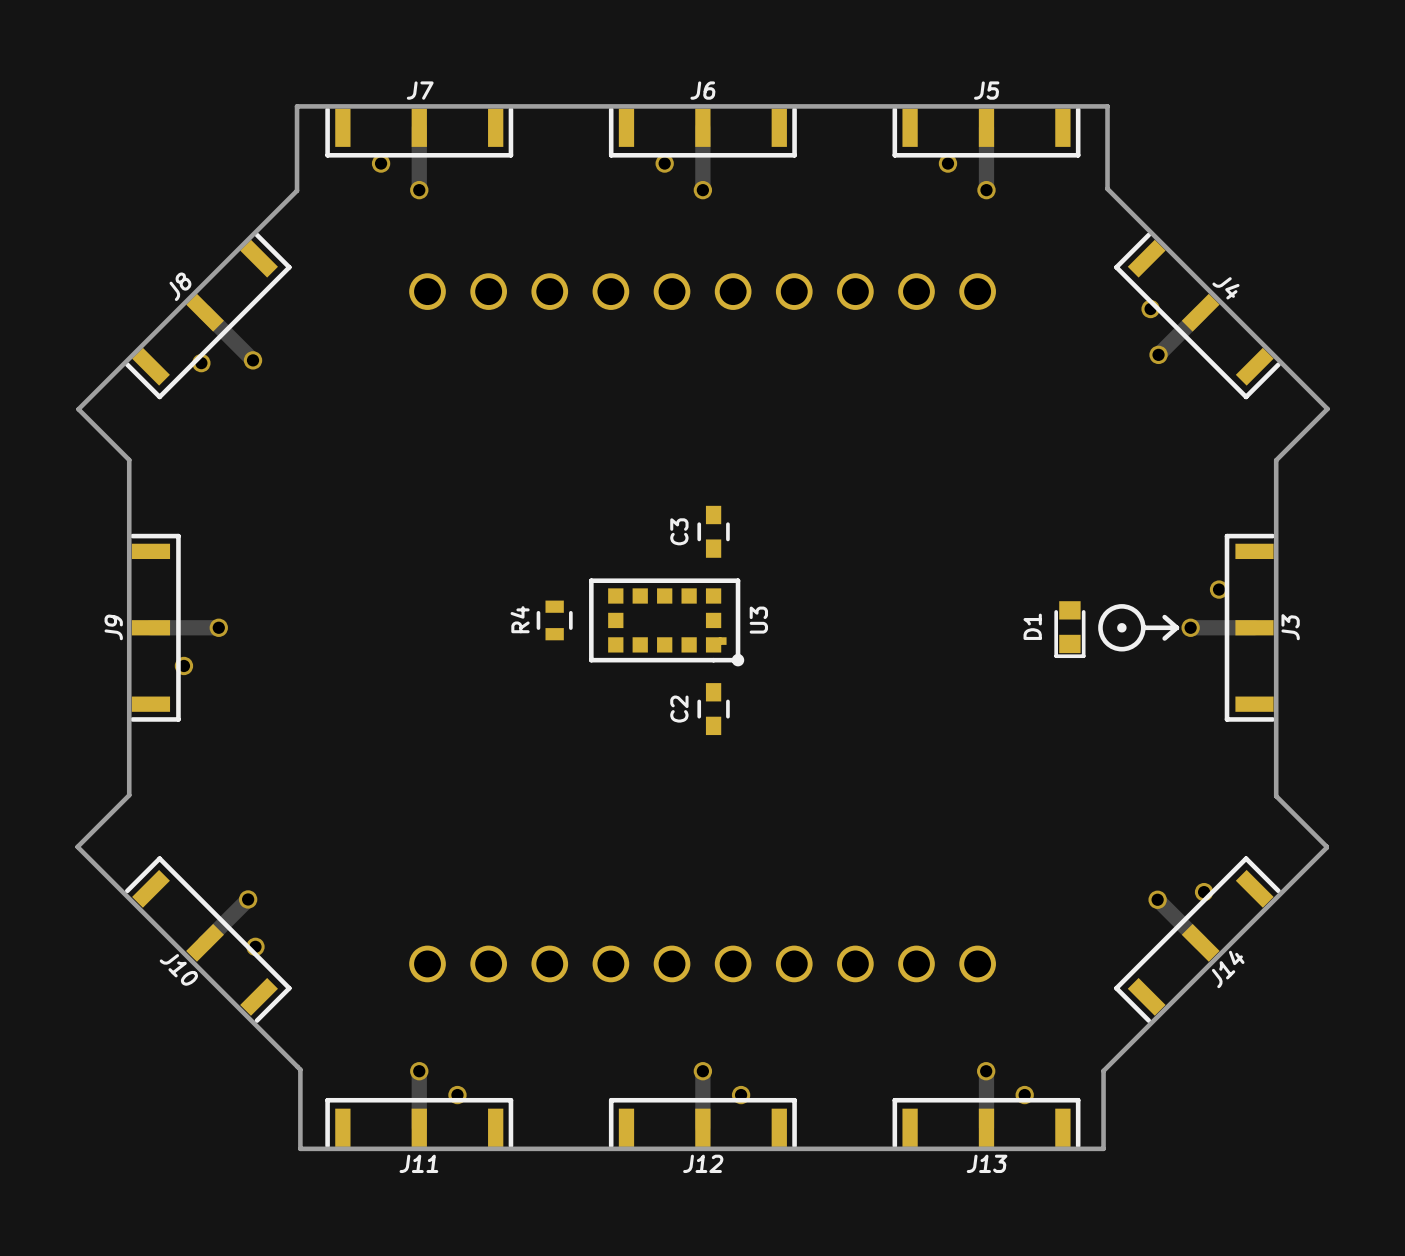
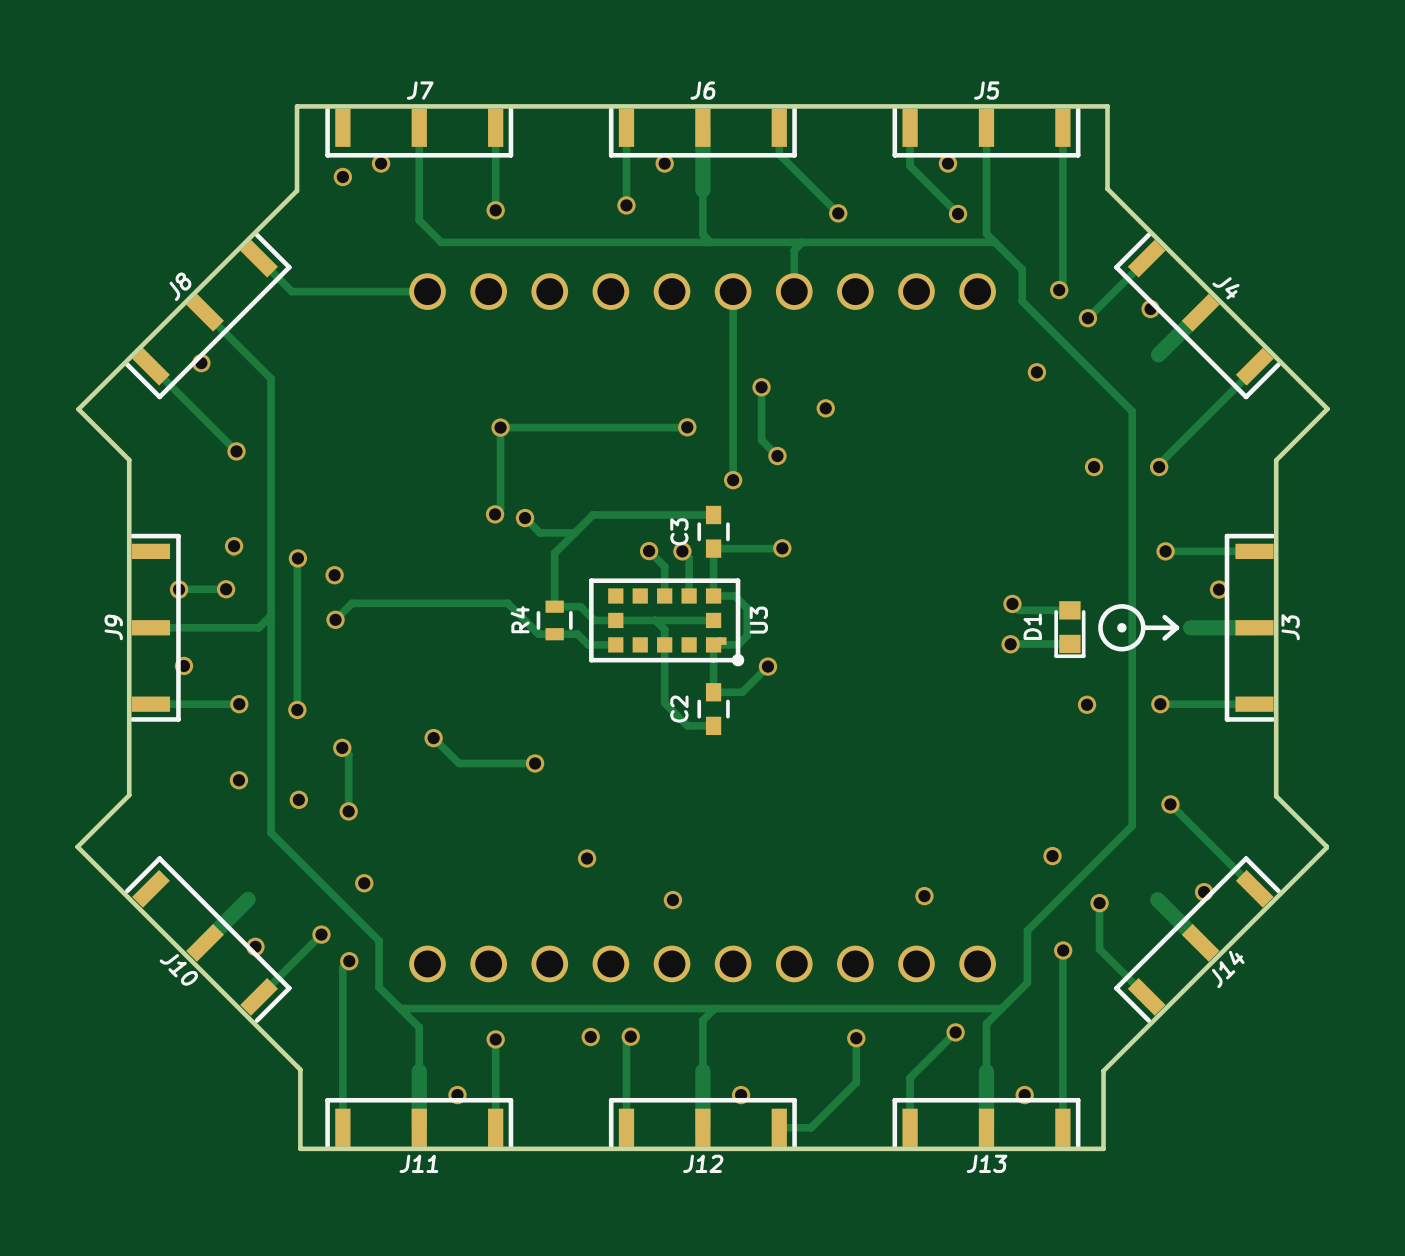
track width: thick (419, 127) (419, 190) -> thin (419, 127) (419, 190)
track: none -> (495, 127) (495, 210)
track: none -> (626, 127) (626, 205)
track: none -> (779, 127) (779, 154) (838, 213)
track: none -> (910, 127) (910, 165) (958, 213)
track width: thick (986, 127) (986, 190) -> thin (986, 127) (986, 190)
track: none -> (1062, 127) (1062, 286) (1059, 290)
via: none -> (342, 177)
track: none -> (419, 190) (419, 220) (441, 242) (995, 242)
via: (419, 190) -> none
track: none -> (702, 190) (702, 234) (710, 242)
via: (702, 190) -> none
track: none -> (986, 190) (986, 233) (1022, 269) (1022, 301) (1132, 411) (1132, 825) (1027, 930) (1027, 982) (986, 1023) (986, 1071)
via position: (986, 190) -> (958, 213)
via: none -> (626, 205)
via: none -> (495, 210)
via: none -> (838, 213)
track: none -> (802, 242) (794, 250) (794, 291)
track: none -> (259, 258) (291, 291) (427, 291)
track: none -> (1146, 258) (1087, 318)
via: none -> (1059, 290)
track: none -> (733, 291) (733, 480)
track width: thick (205, 312) (253, 360) -> thin (205, 312) (253, 360)
via: none -> (1087, 318)
via: (1158, 354) -> none
track: none -> (253, 360) (271, 378) (271, 832) (379, 940) (379, 987) (419, 1027) (419, 1071)
via: (253, 360) -> none
track: none -> (151, 366) (236, 451)
track: none -> (1254, 366) (1159, 464) (1159, 467)
via: none -> (1036, 372)
track: none -> (761, 387) (761, 440) (777, 456)
via: none -> (761, 387)
via: none -> (825, 408)
via: none -> (500, 427)
track: none -> (686, 427) (500, 427) (500, 508) (495, 514)
via: none -> (687, 427)
via: none -> (236, 451)
via: none -> (777, 456)
via: none -> (1094, 467)
via: none -> (1159, 467)
via: none -> (733, 480)
via: none -> (495, 514)
track: none -> (713, 515) (592, 515) (554, 553) (554, 606) (580, 606) (594, 620) (713, 620)
track: none -> (525, 518) (539, 532) (574, 532)
via: none -> (525, 518)
via: none -> (234, 546)
track: none -> (782, 548) (713, 548) (713, 595) (734, 595) (747, 608) (747, 635) (738, 644) (713, 644) (713, 692) (742, 692) (767, 666)
via: none -> (782, 548)
track: none -> (649, 551) (664, 566) (664, 595)
via: none -> (649, 551)
track: none -> (682, 551) (689, 558) (689, 595)
via: none -> (682, 551)
track: none -> (1165, 551) (1254, 551)
via: none -> (1165, 551)
track: none -> (297, 558) (297, 709)
via: none -> (297, 558)
via: none -> (334, 575)
track: none -> (179, 589) (226, 589)
via: none -> (179, 589)
via: none -> (226, 589)
track: none -> (1012, 603) (1018, 610) (1069, 610)
via: none -> (1012, 603)
track: none -> (271, 615) (258, 627) (218, 627)
track: none -> (335, 619) (352, 603) (507, 603) (538, 634) (577, 634) (588, 644) (615, 644)
via: none -> (335, 619)
track: none -> (655, 620) (664, 629) (664, 702) (687, 725) (713, 725)
track width: thick (150, 627) (218, 627) -> thin (150, 627) (218, 627)
via: (218, 627) -> none
via: (1190, 627) -> none
track: none -> (1010, 643) (1069, 643)
via: none -> (1010, 644)
via: none -> (767, 666)
track: none -> (150, 704) (239, 704)
via: none -> (239, 704)
via: none -> (1087, 704)
track: none -> (1160, 704) (1254, 704)
via: none -> (1160, 704)
via: none -> (297, 709)
track: none -> (433, 738) (459, 763) (535, 763)
via: none -> (433, 738)
track: none -> (342, 747) (348, 754) (348, 811)
via: none -> (342, 747)
via: none -> (535, 763)
via: none -> (238, 780)
via: none -> (298, 799)
track: none -> (1170, 804) (1254, 888)
via: none -> (1170, 804)
via: none -> (348, 811)
via: none -> (1052, 856)
via: none -> (587, 858)
via: none -> (364, 883)
via: none -> (924, 896)
via: (248, 899) -> none
via: (1157, 899) -> none
via: none -> (672, 900)
track: none -> (1099, 903) (1099, 949) (1146, 996)
via: none -> (1099, 903)
track: none -> (321, 934) (259, 996)
via: none -> (321, 934)
track: none -> (1062, 950) (1062, 1127)
via: none -> (1063, 950)
track: none -> (349, 961) (342, 967) (342, 1127)
via: none -> (349, 961)
track: none -> (400, 1008) (1001, 1008)
track: none -> (714, 1008) (702, 1020) (702, 1071)
track: none -> (955, 1032) (910, 1077) (910, 1127)
via: none -> (590, 1036)
track: none -> (630, 1036) (626, 1040) (626, 1127)
via: none -> (630, 1036)
track: none -> (856, 1038) (856, 1082) (811, 1127) (779, 1127)
via: none -> (856, 1038)
track: none -> (495, 1039) (495, 1127)
via: none -> (495, 1039)
via: (419, 1071) -> none
via: (702, 1071) -> none
via position: (986, 1071) -> (955, 1032)

